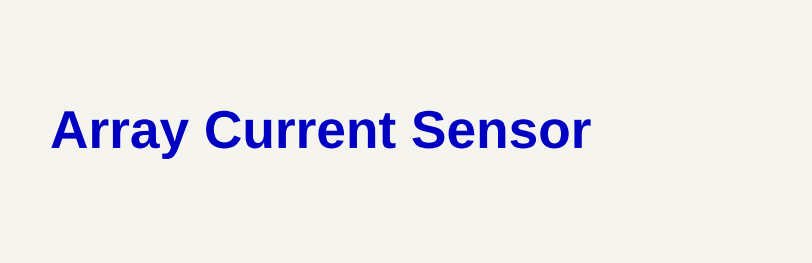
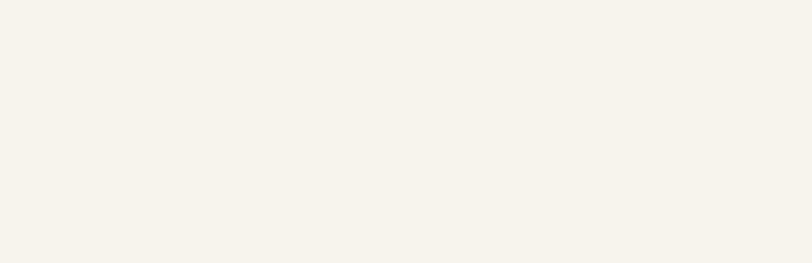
text: Array Current Sensor (320, 134) -> none

